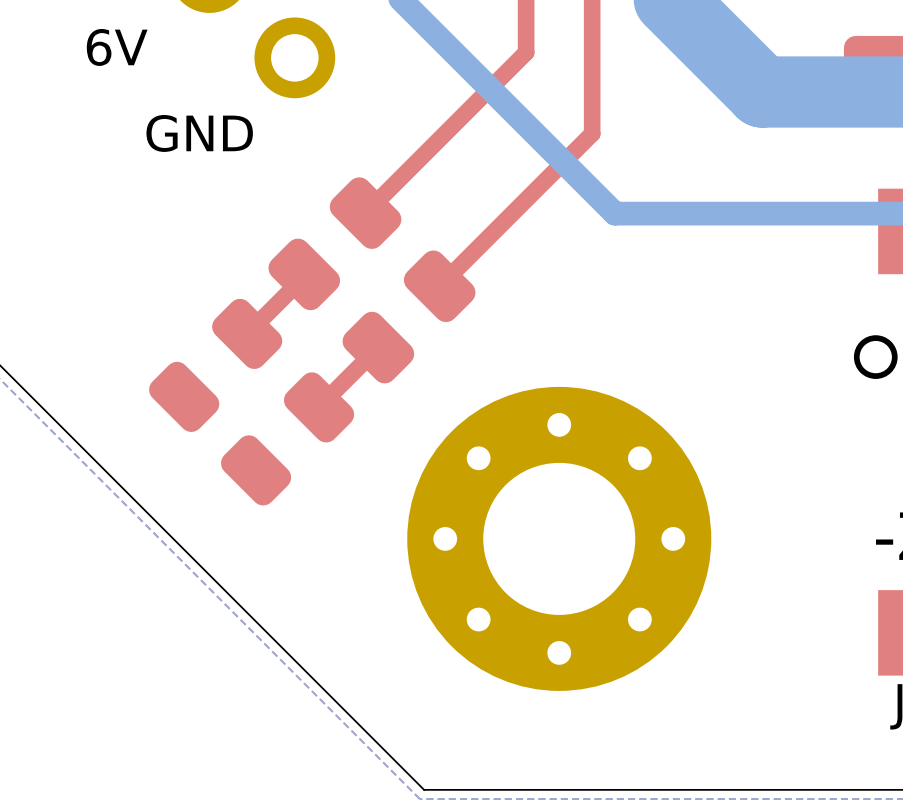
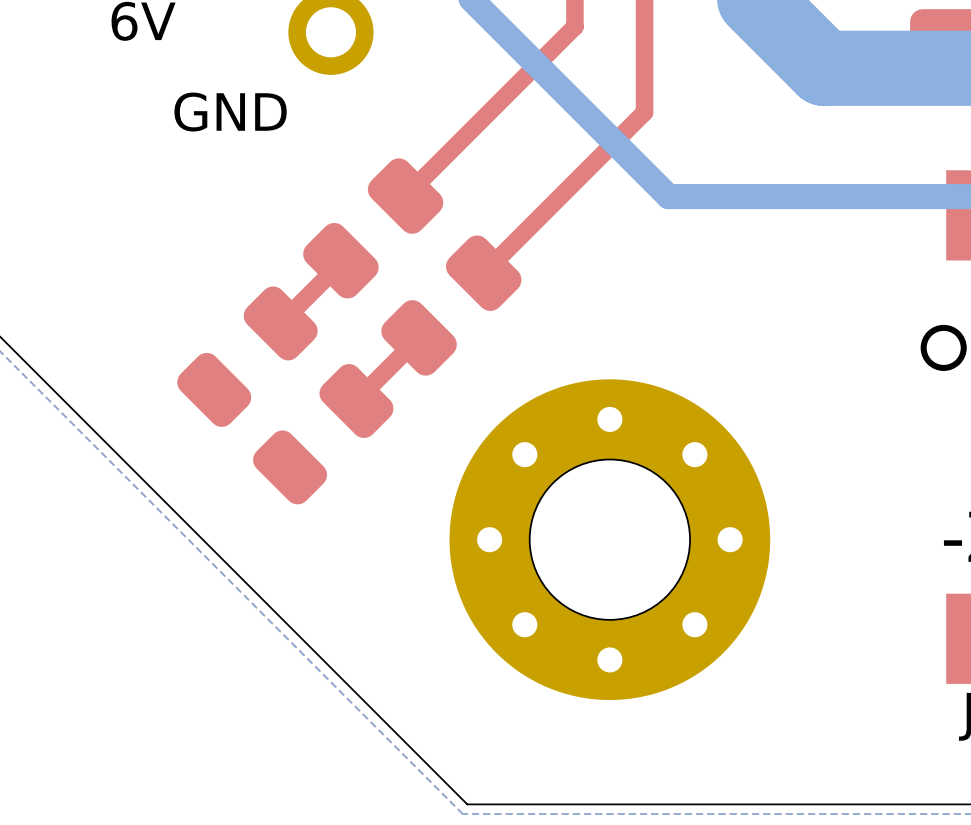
round board edge: none -> [529, 459, 691, 621]

